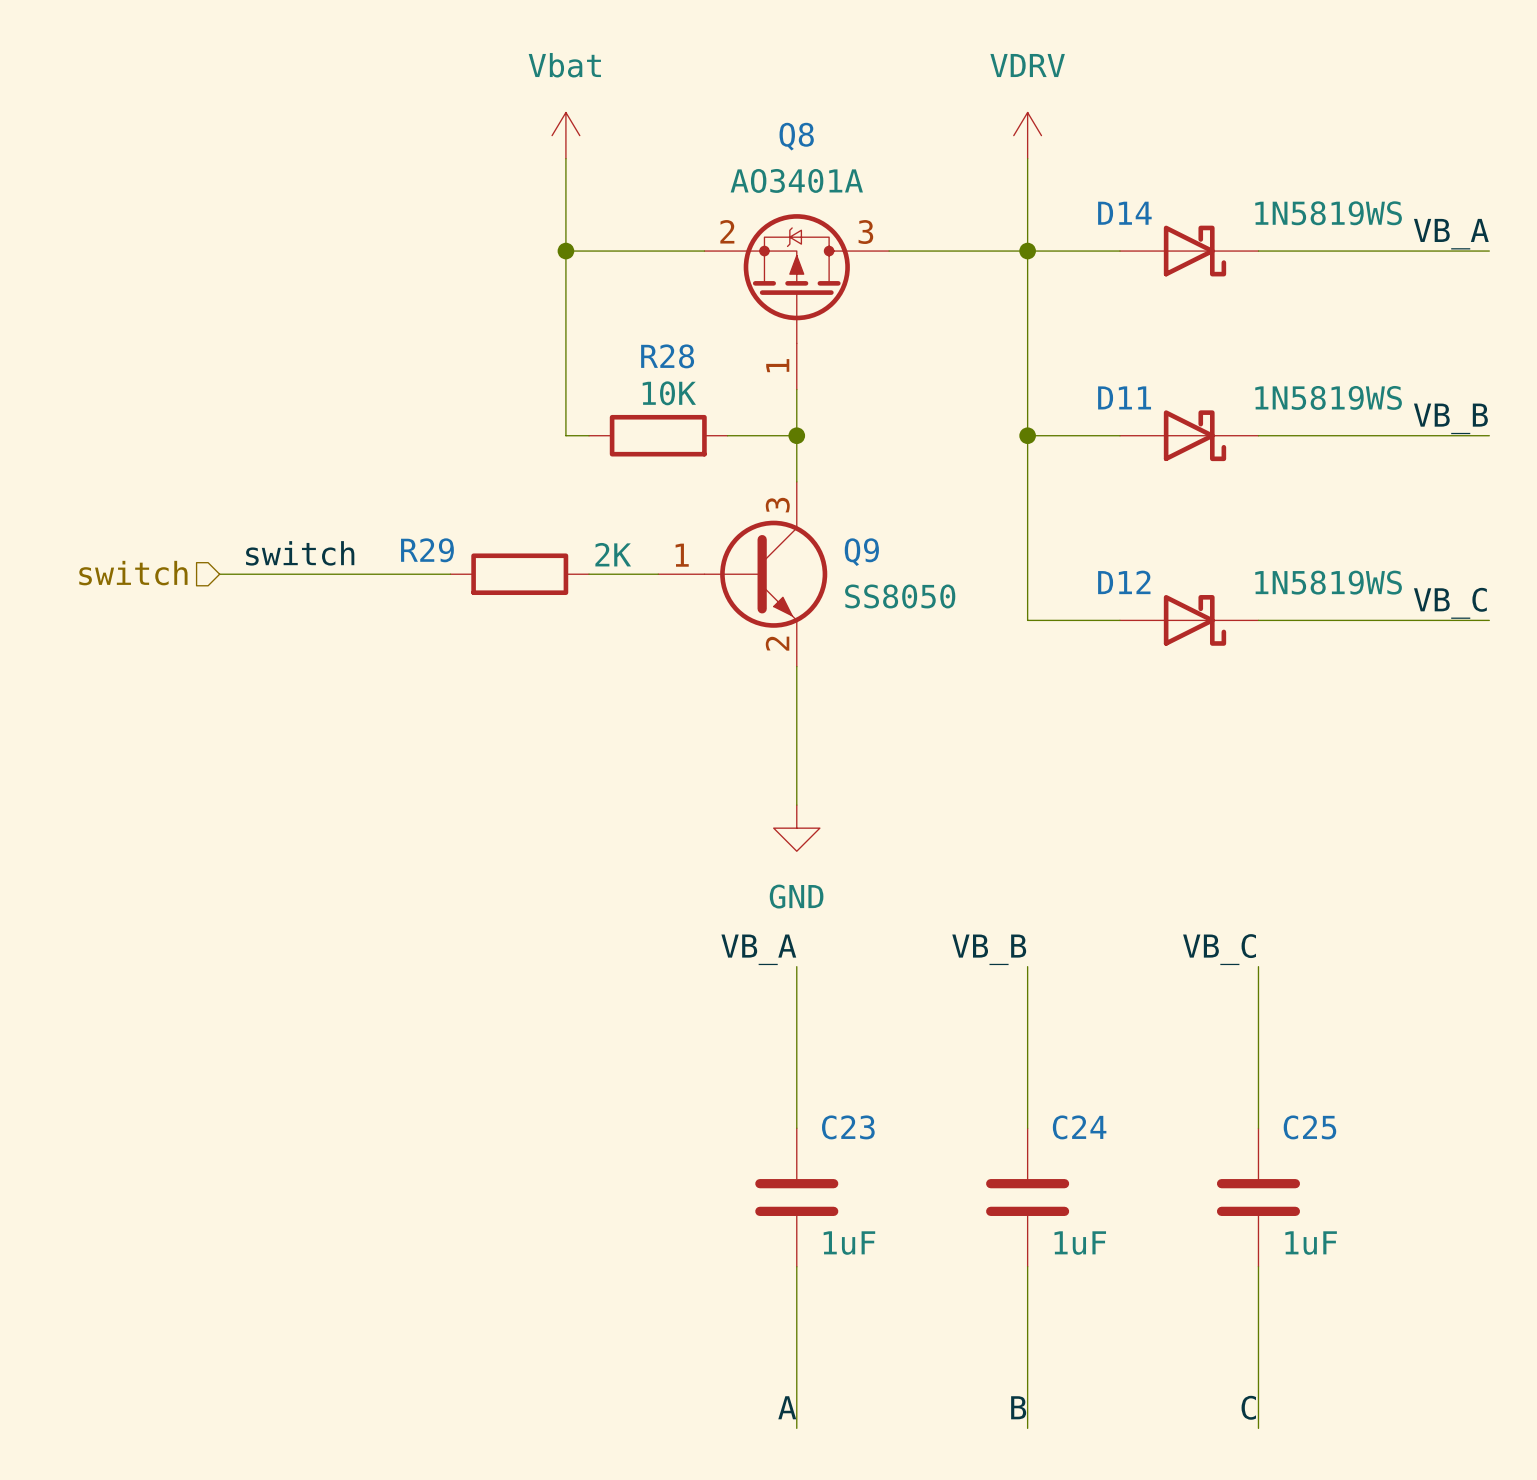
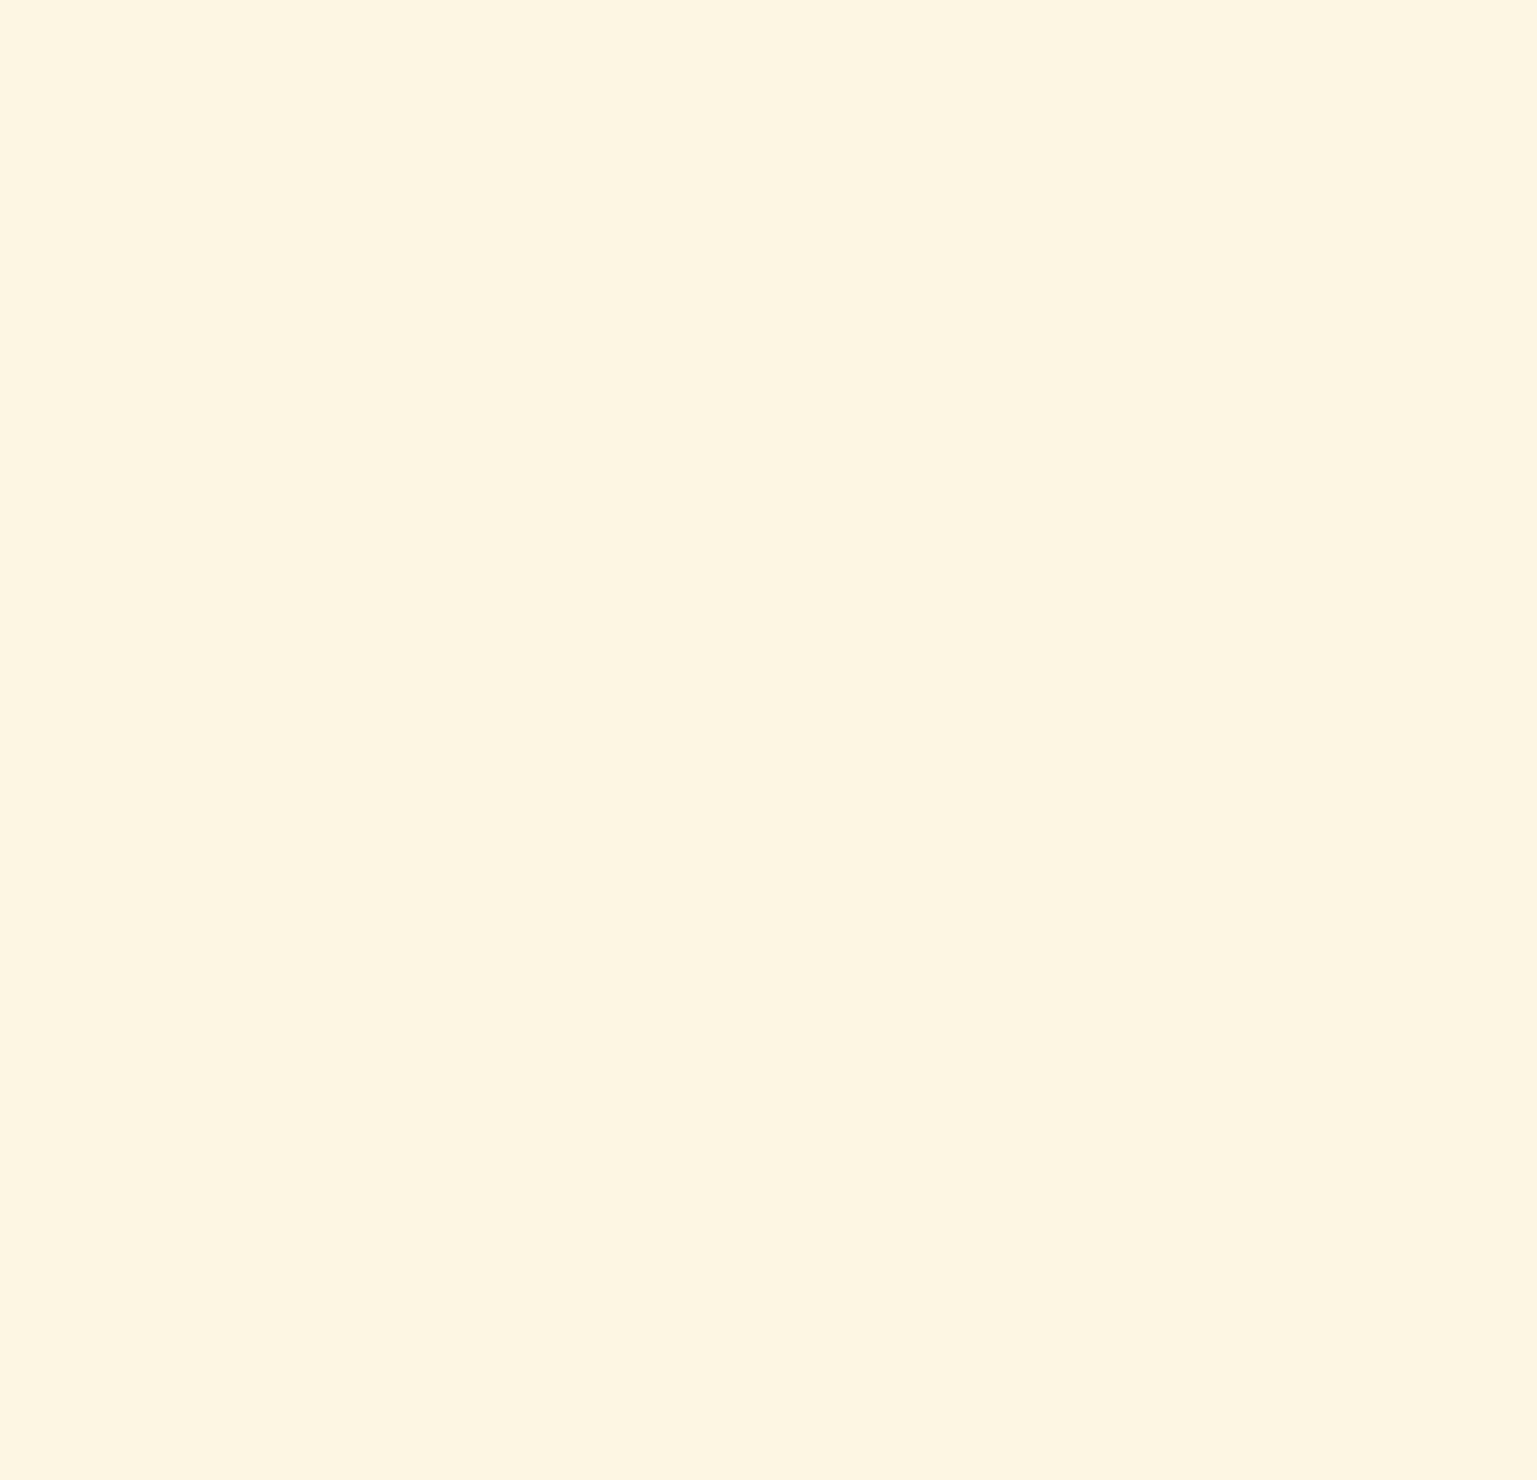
power symbol: Vbat (565, 135) -> none
power symbol: VDRV (1027, 135) -> none
wire: (565, 158) (565, 435) (589, 435) -> none
wire: (1027, 158) (1027, 620) (1119, 620) -> none
label: VB_A (1451, 234) -> none
wire: (565, 251) (704, 251) -> none
junction: (565, 251) -> none
wire: (889, 251) (1119, 251) -> none
junction: (1027, 251) -> none
D14: 1N5819WS (1189, 251) -> none
wire: (1258, 251) (1489, 251) -> none
Q8: AO3401A (796, 301) -> none
wire: (796, 389) (796, 481) -> none
label: VB_B (1450, 418) -> none
R28: 10K (658, 435) -> none
wire: (727, 435) (796, 435) -> none
junction: (796, 435) -> none
wire: (1027, 435) (1119, 435) -> none
junction: (1027, 435) -> none
D11: 1N5819WS (1189, 435) -> none
wire: (1258, 435) (1489, 435) -> none
label: switch (300, 553) -> none
hierarchical label: switch (133, 573) -> none
wire: (219, 574) (450, 574) -> none
R29: 2K (519, 574) -> none
wire: (589, 574) (658, 574) -> none
Q9: SS8050 (742, 574) -> none
label: VB_C (1450, 603) -> none
D12: 1N5819WS (1189, 620) -> none
wire: (1258, 620) (1489, 620) -> none
wire: (796, 666) (796, 805) -> none
power symbol: GND (796, 828) -> none
label: VB_A (758, 949) -> none
label: VB_B (989, 949) -> none
label: VB_C (1219, 949) -> none
wire: (796, 966) (796, 1128) -> none
wire: (1027, 966) (1027, 1128) -> none
wire: (1258, 966) (1258, 1128) -> none
C23: 1uF (796, 1197) -> none
C24: 1uF (1027, 1197) -> none
C25: 1uF (1258, 1197) -> none
wire: (796, 1266) (796, 1428) -> none
wire: (1027, 1266) (1027, 1428) -> none
wire: (1258, 1266) (1258, 1428) -> none
label: A (787, 1407) -> none
label: B (1018, 1407) -> none
label: C (1248, 1407) -> none

